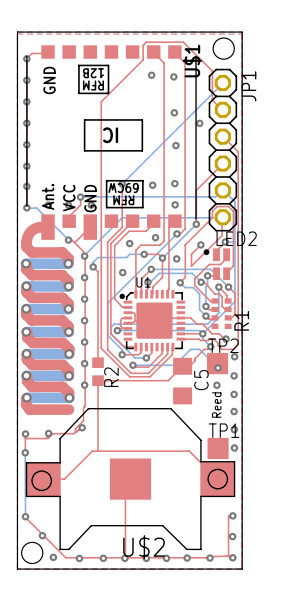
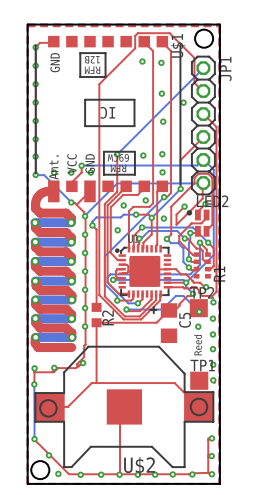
line: none -> (153, 307) (153, 313)
line: none -> (150, 310) (156, 310)

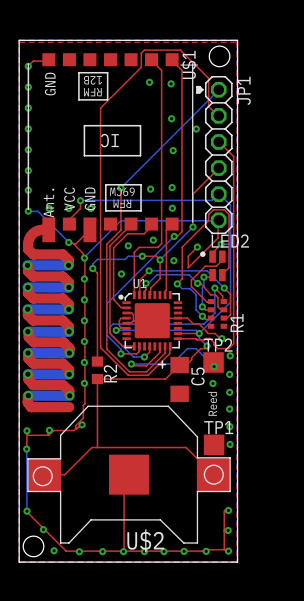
line: none -> (196, 86) (202, 89) (199, 92) (196, 92) (196, 86)
line: none -> (198, 87) (198, 90) (199, 87) (201, 89) (197, 91)

